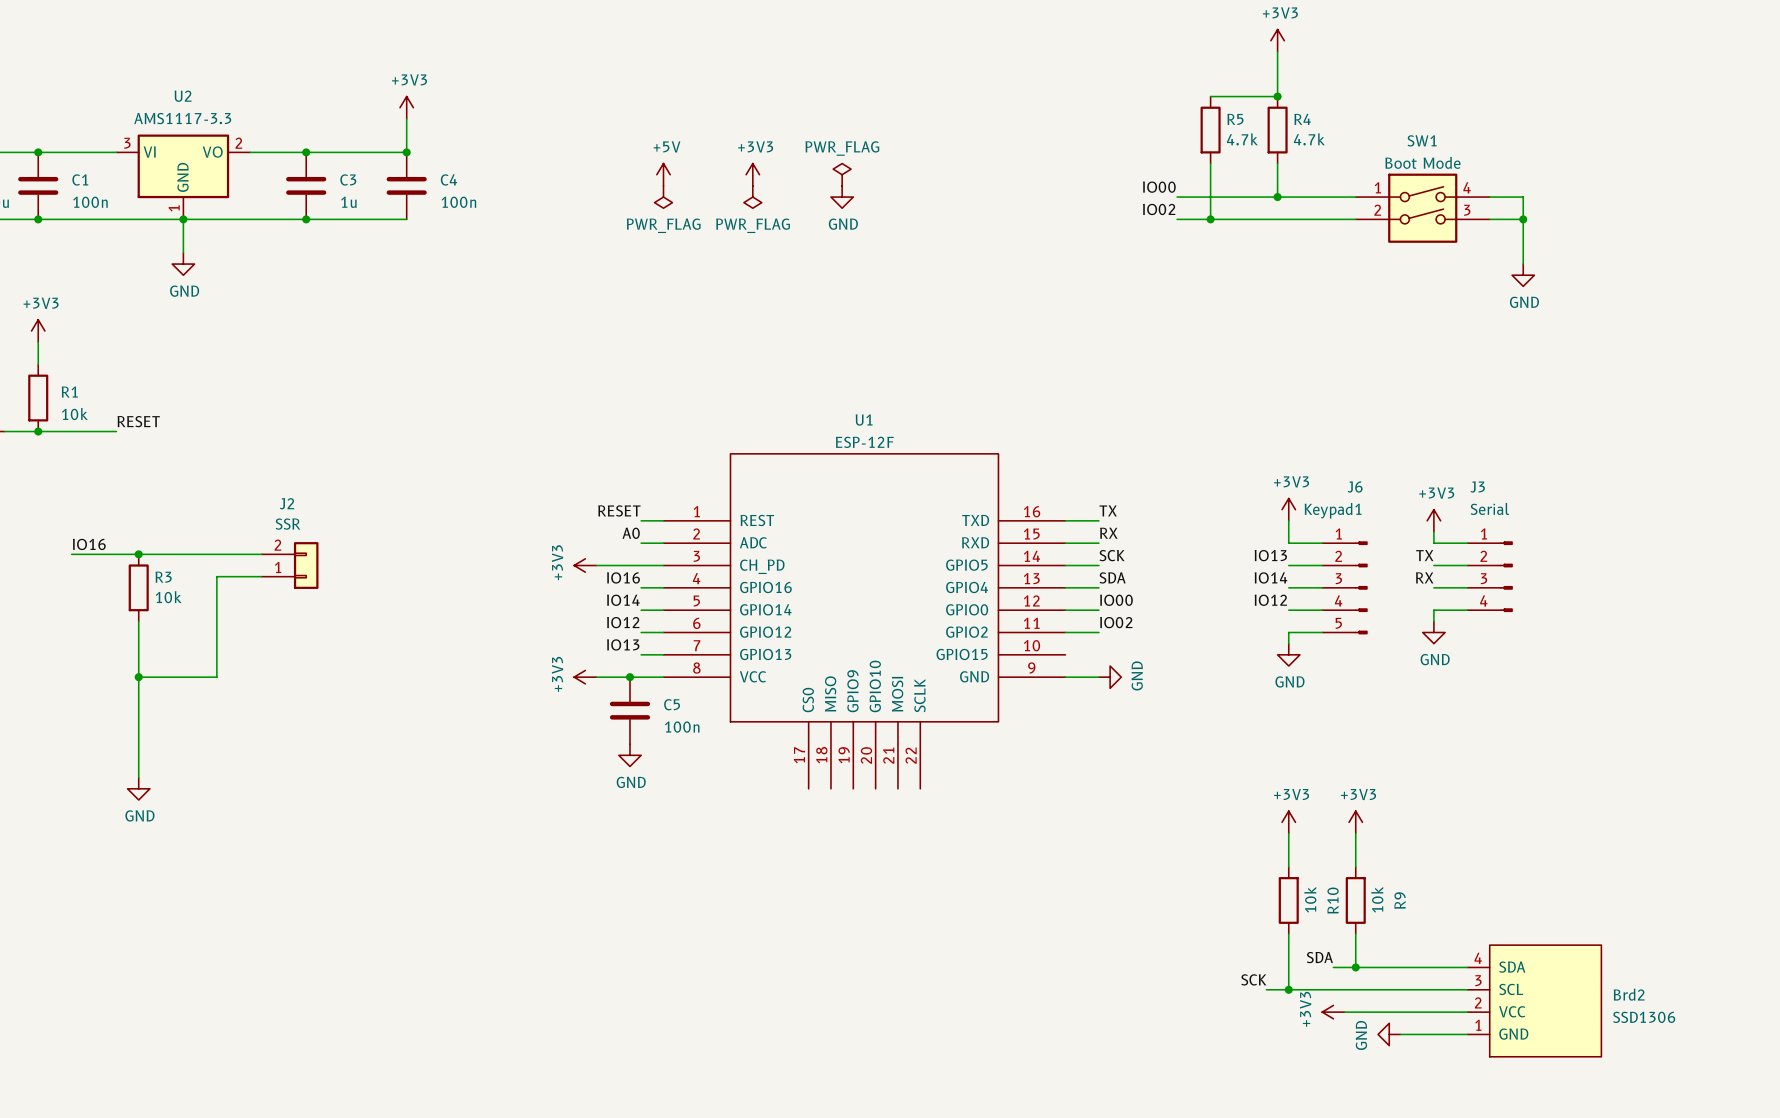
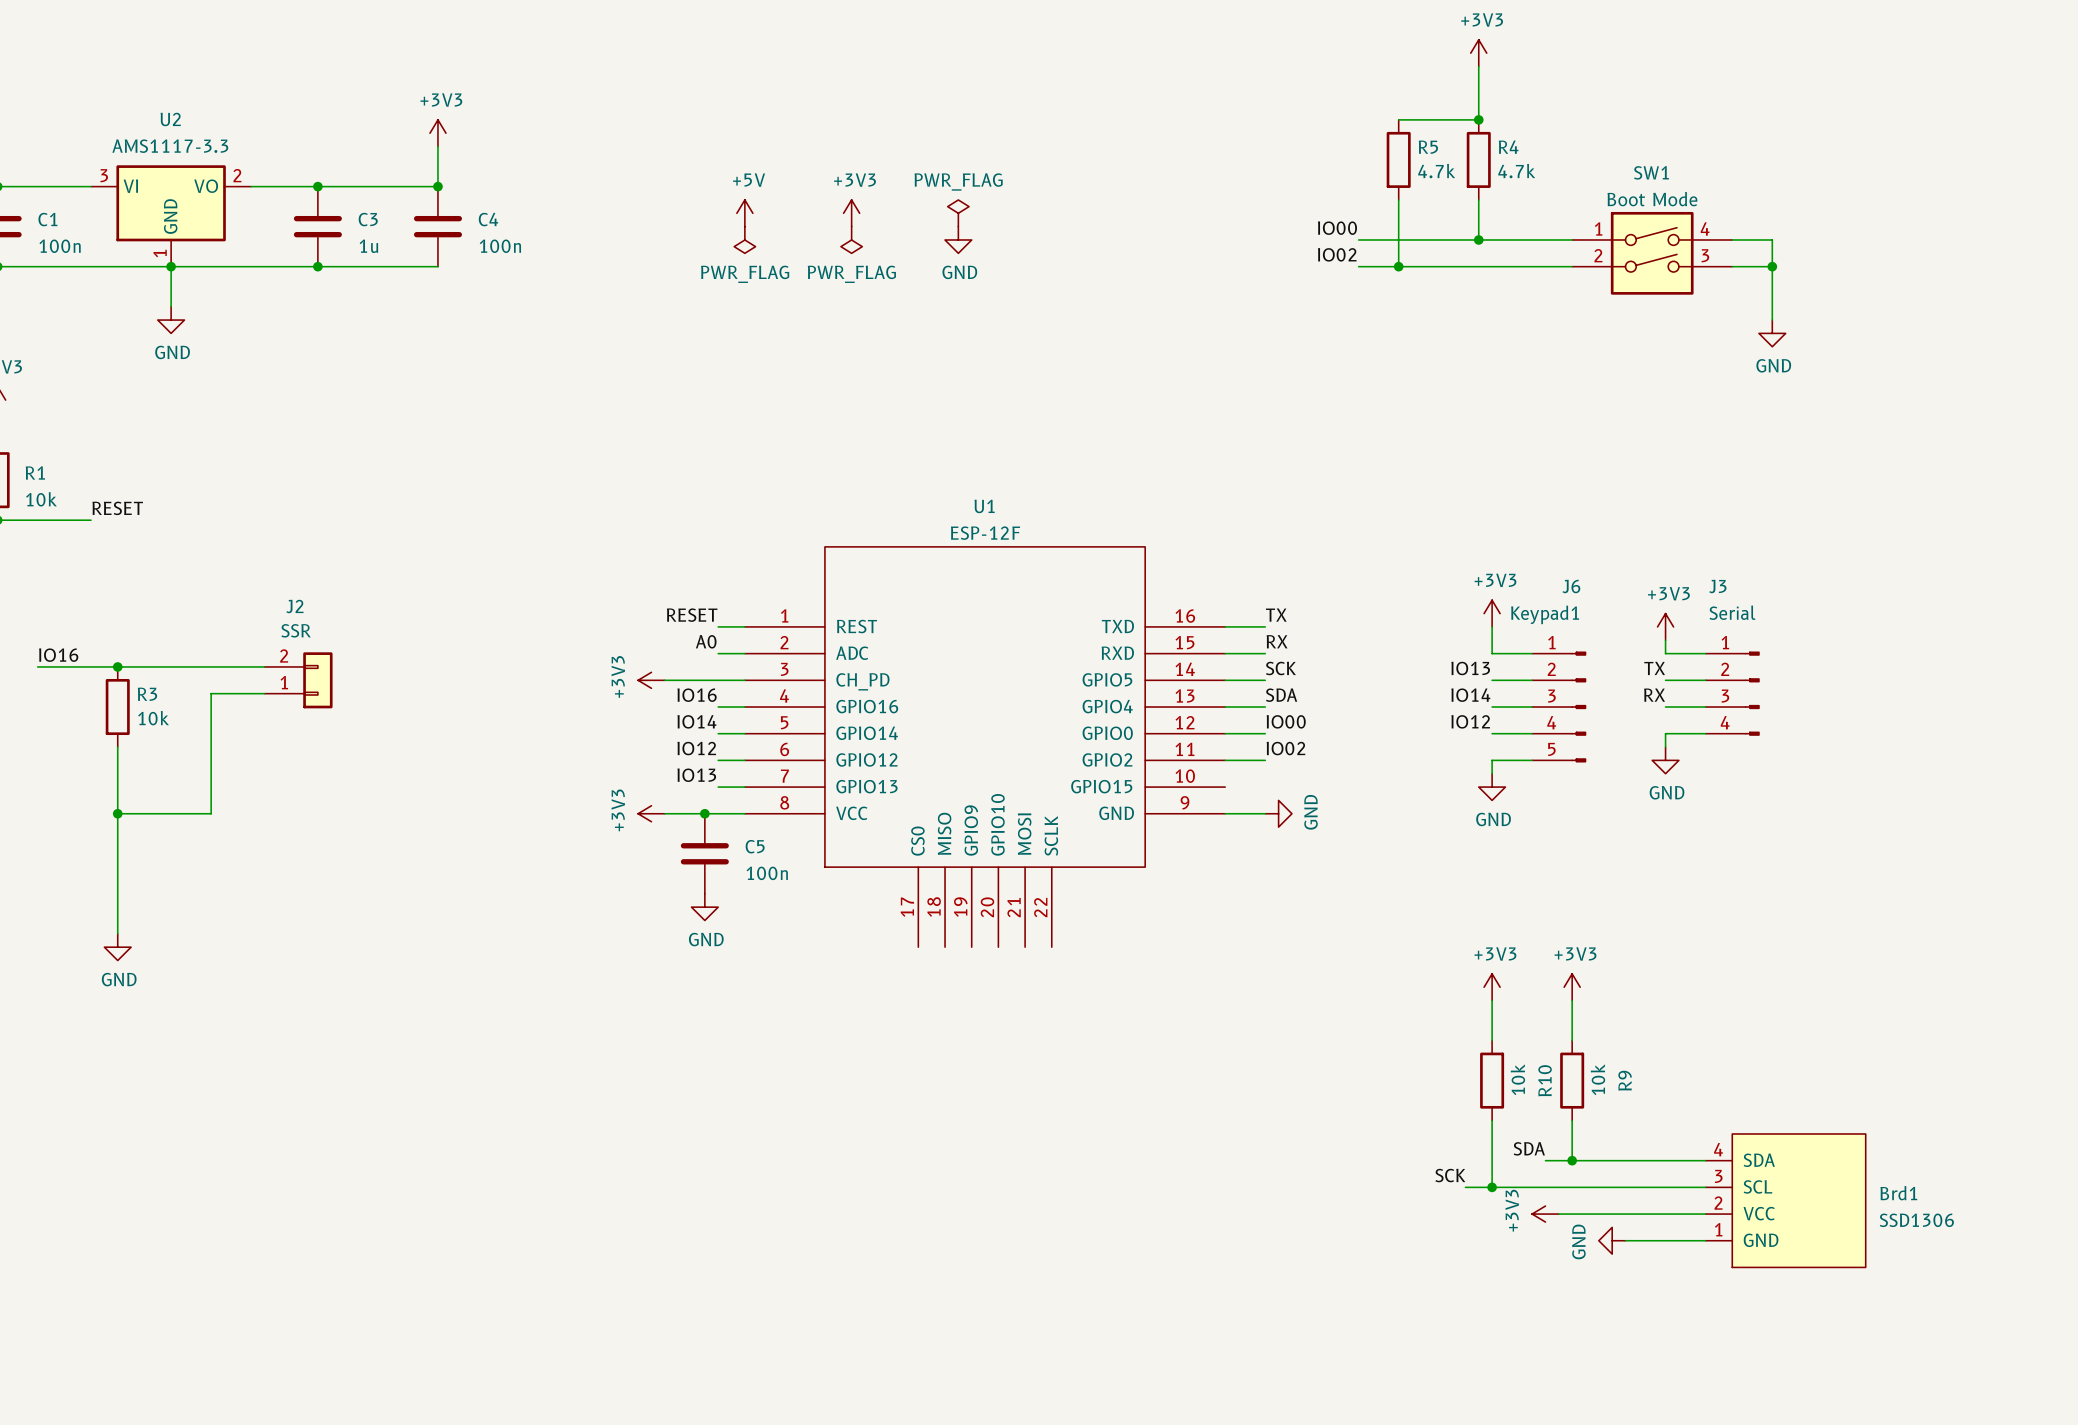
Brd2 name: Brd2 (1629, 994) -> Brd1 (1898, 1193)

